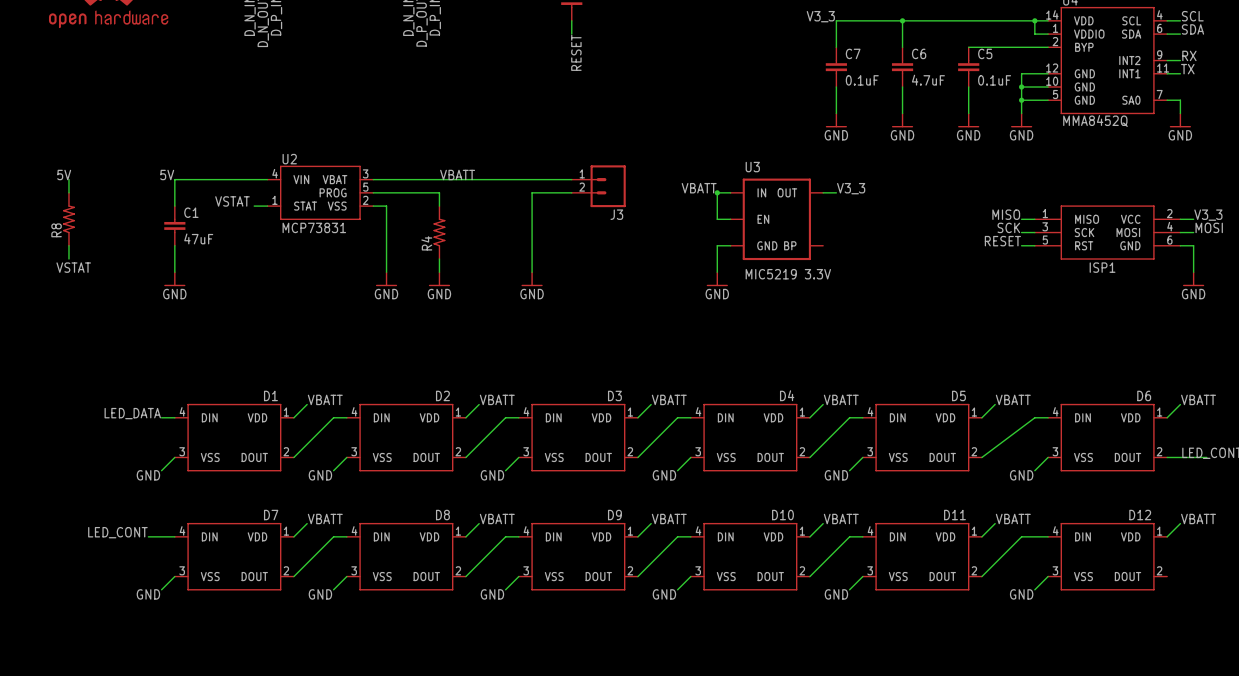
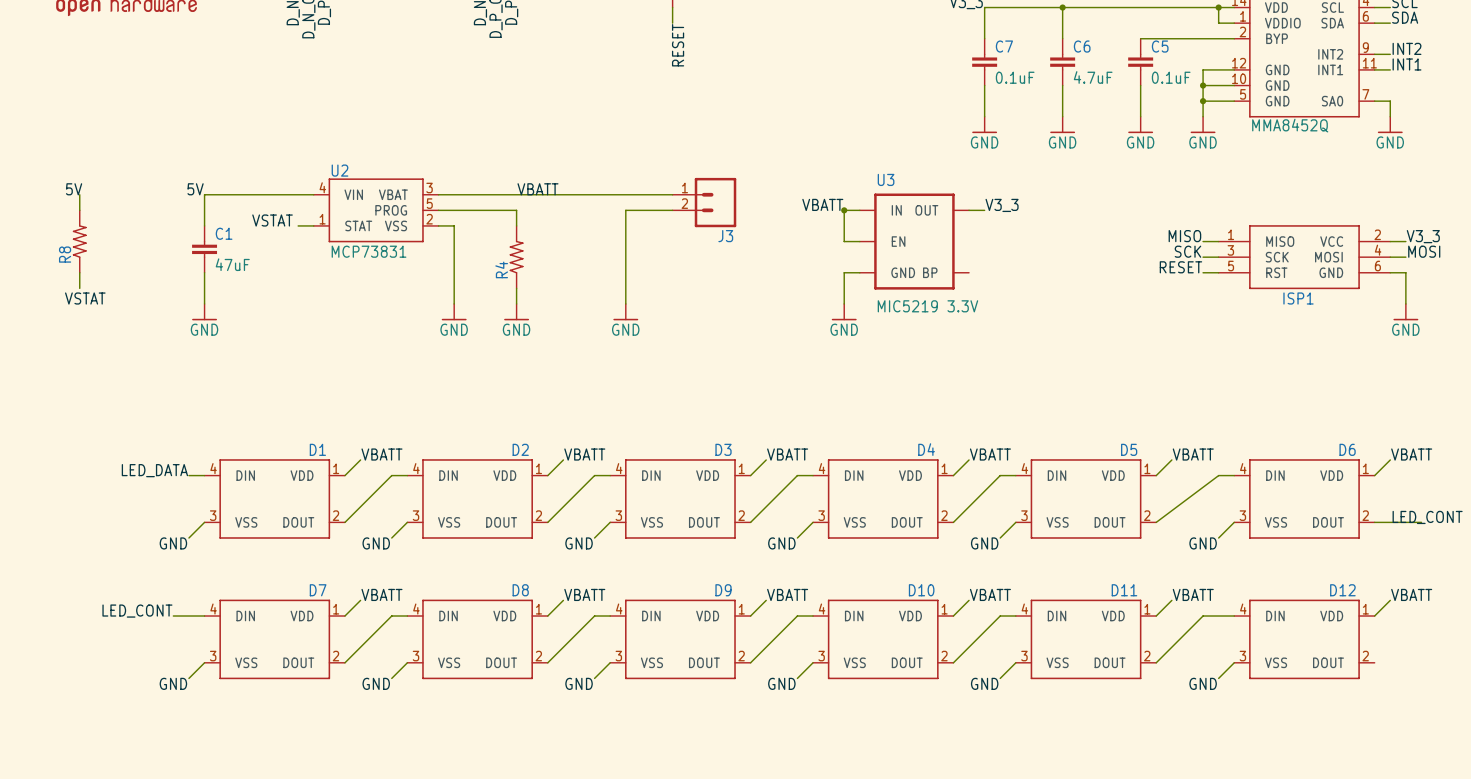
label: RX (1189, 55) -> INT2 (1407, 48)
label: TX (1187, 69) -> INT1 (1407, 64)

